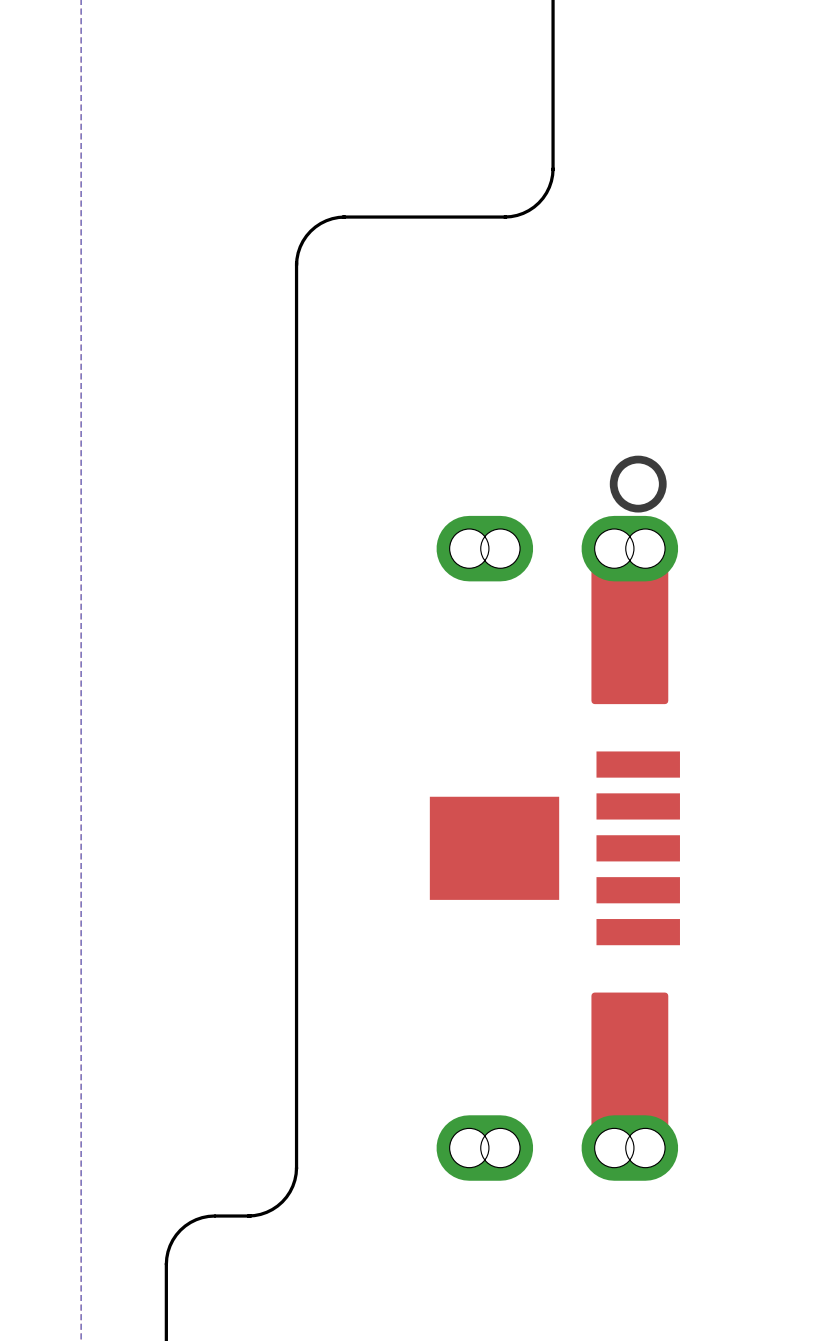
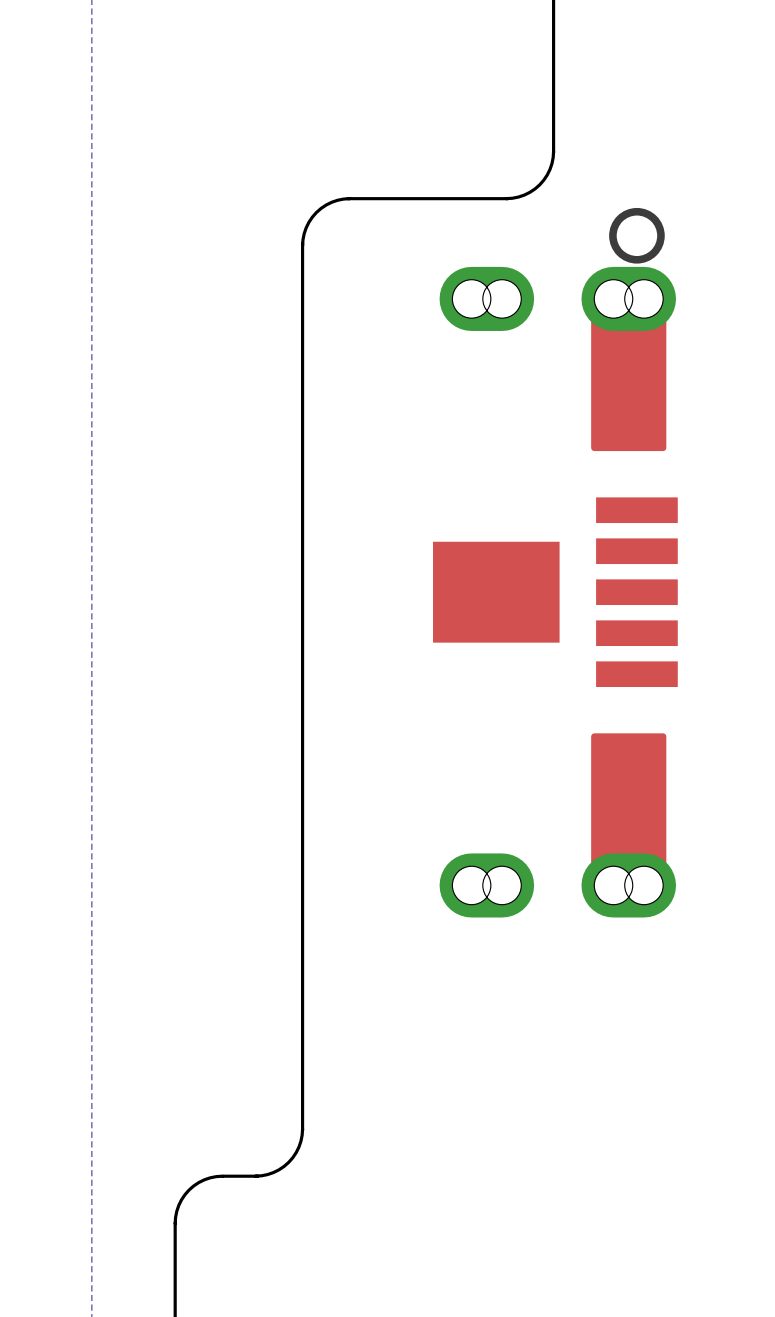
part position: (554, 818) -> (555, 562)

